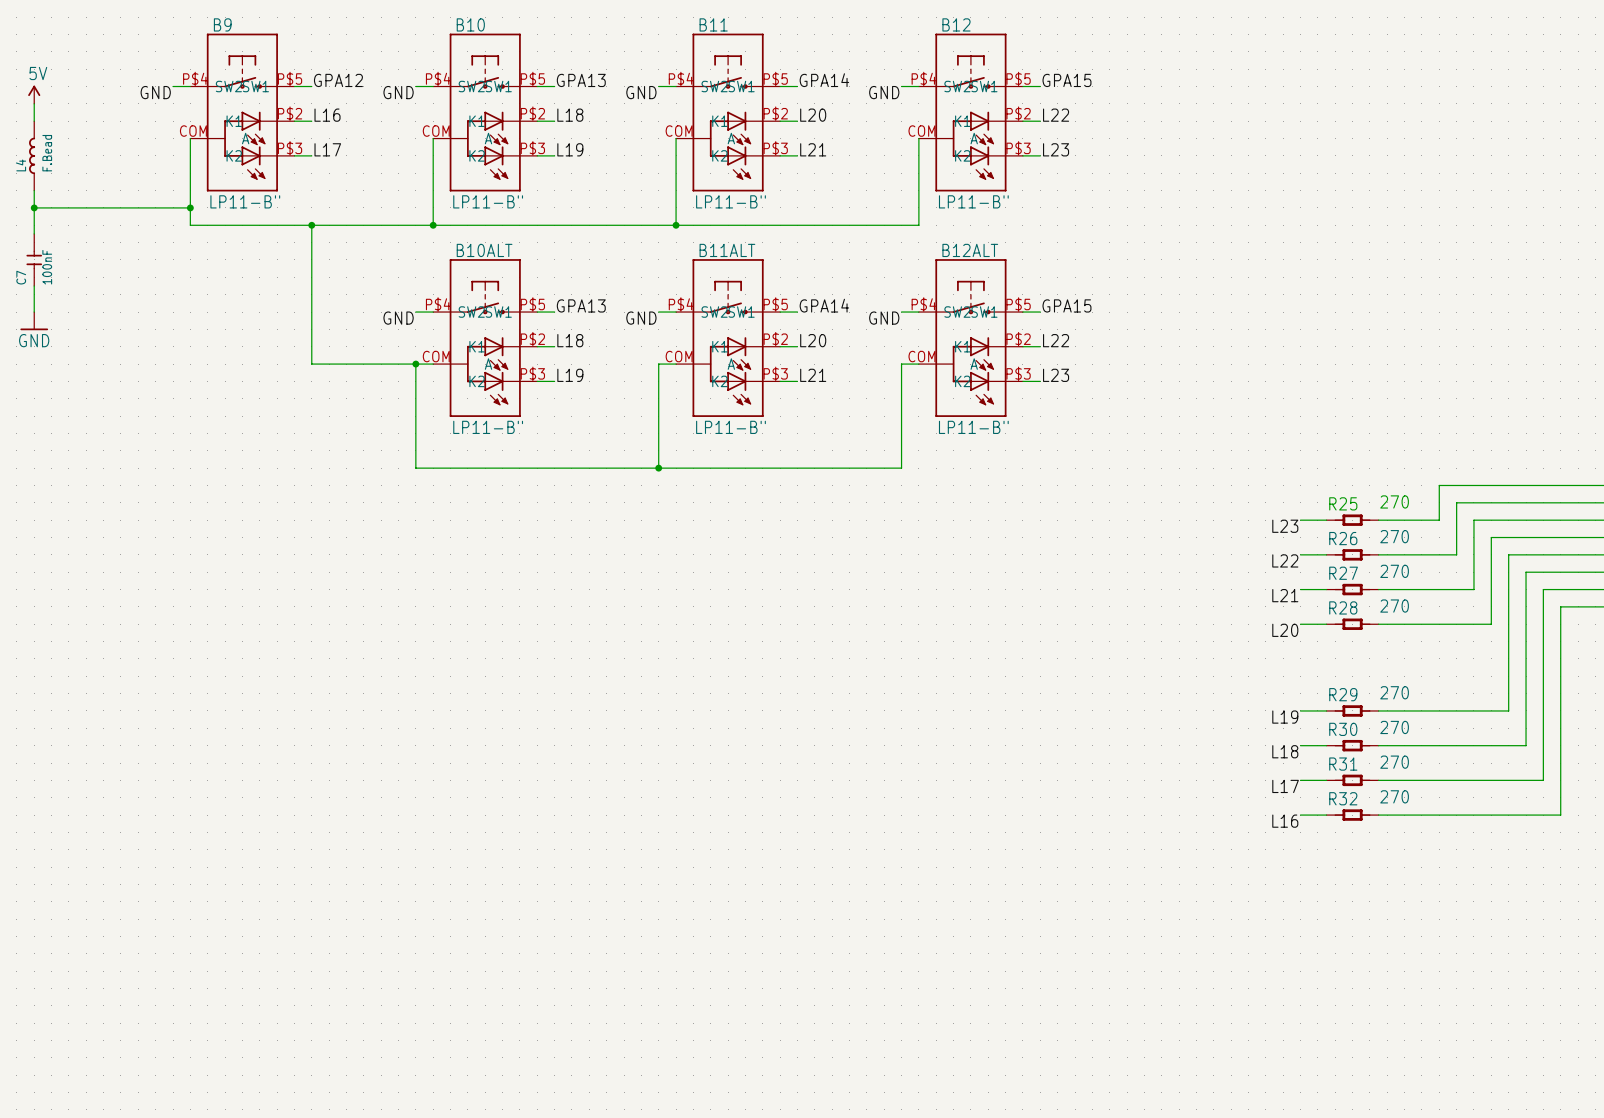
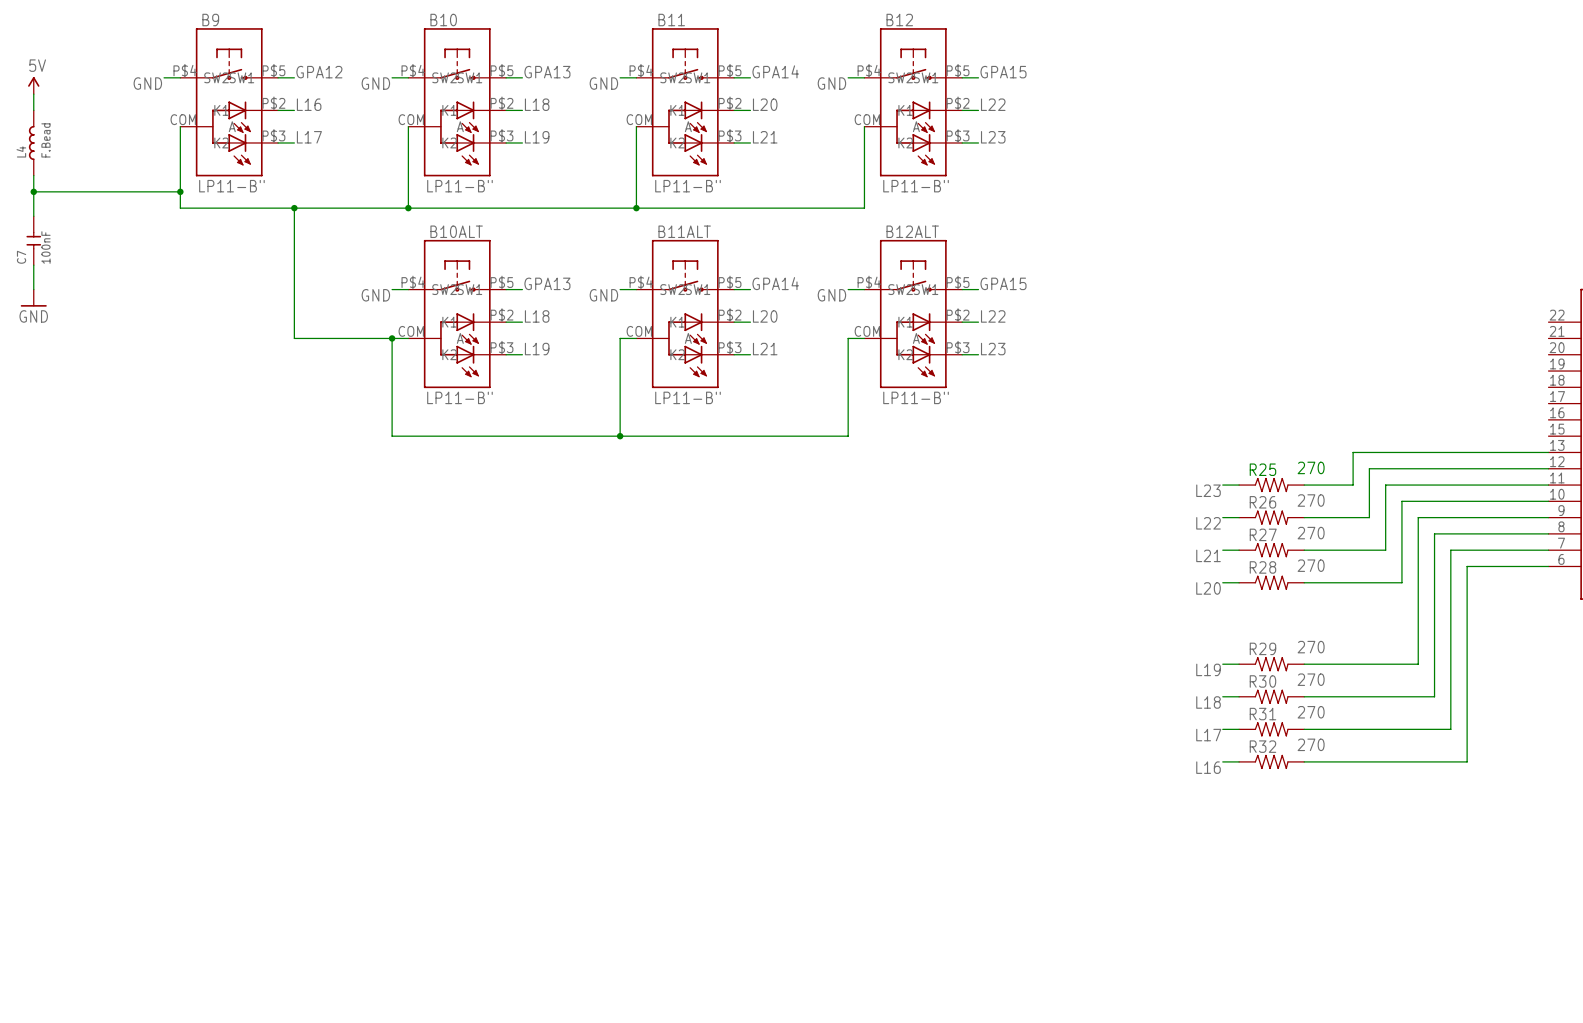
R25 symbol: [1326, 514, 1379, 526] -> [1239, 478, 1305, 493]
R26 symbol: [1326, 549, 1379, 561] -> [1239, 510, 1305, 525]
R27 symbol: [1326, 583, 1379, 596] -> [1239, 543, 1305, 558]
R28 symbol: [1326, 618, 1379, 630] -> [1239, 575, 1305, 590]
R29 symbol: [1326, 705, 1379, 717] -> [1239, 657, 1305, 672]
R30 symbol: [1326, 739, 1379, 752] -> [1239, 689, 1305, 704]
R31 symbol: [1326, 774, 1379, 787] -> [1239, 722, 1305, 737]
R32 symbol: [1326, 809, 1379, 821] -> [1239, 754, 1305, 769]

